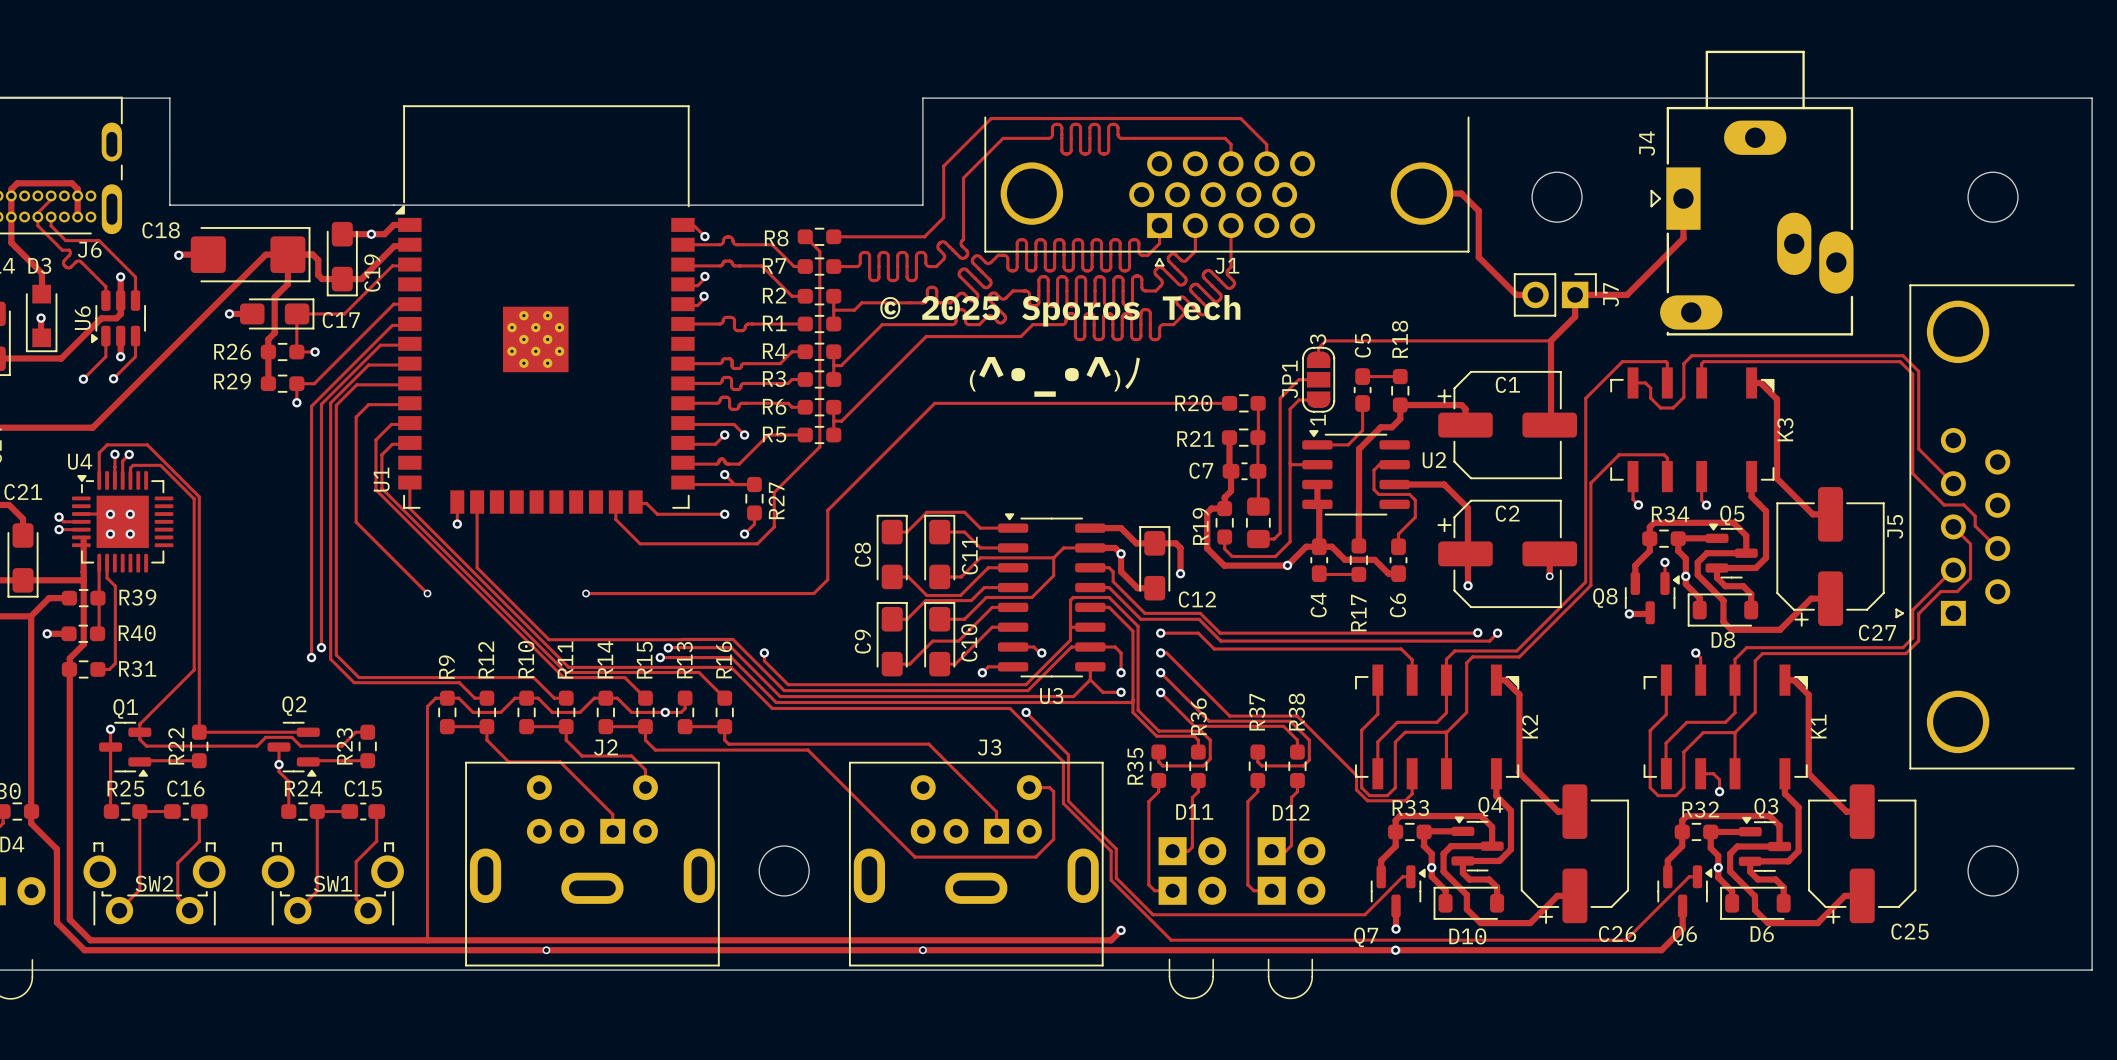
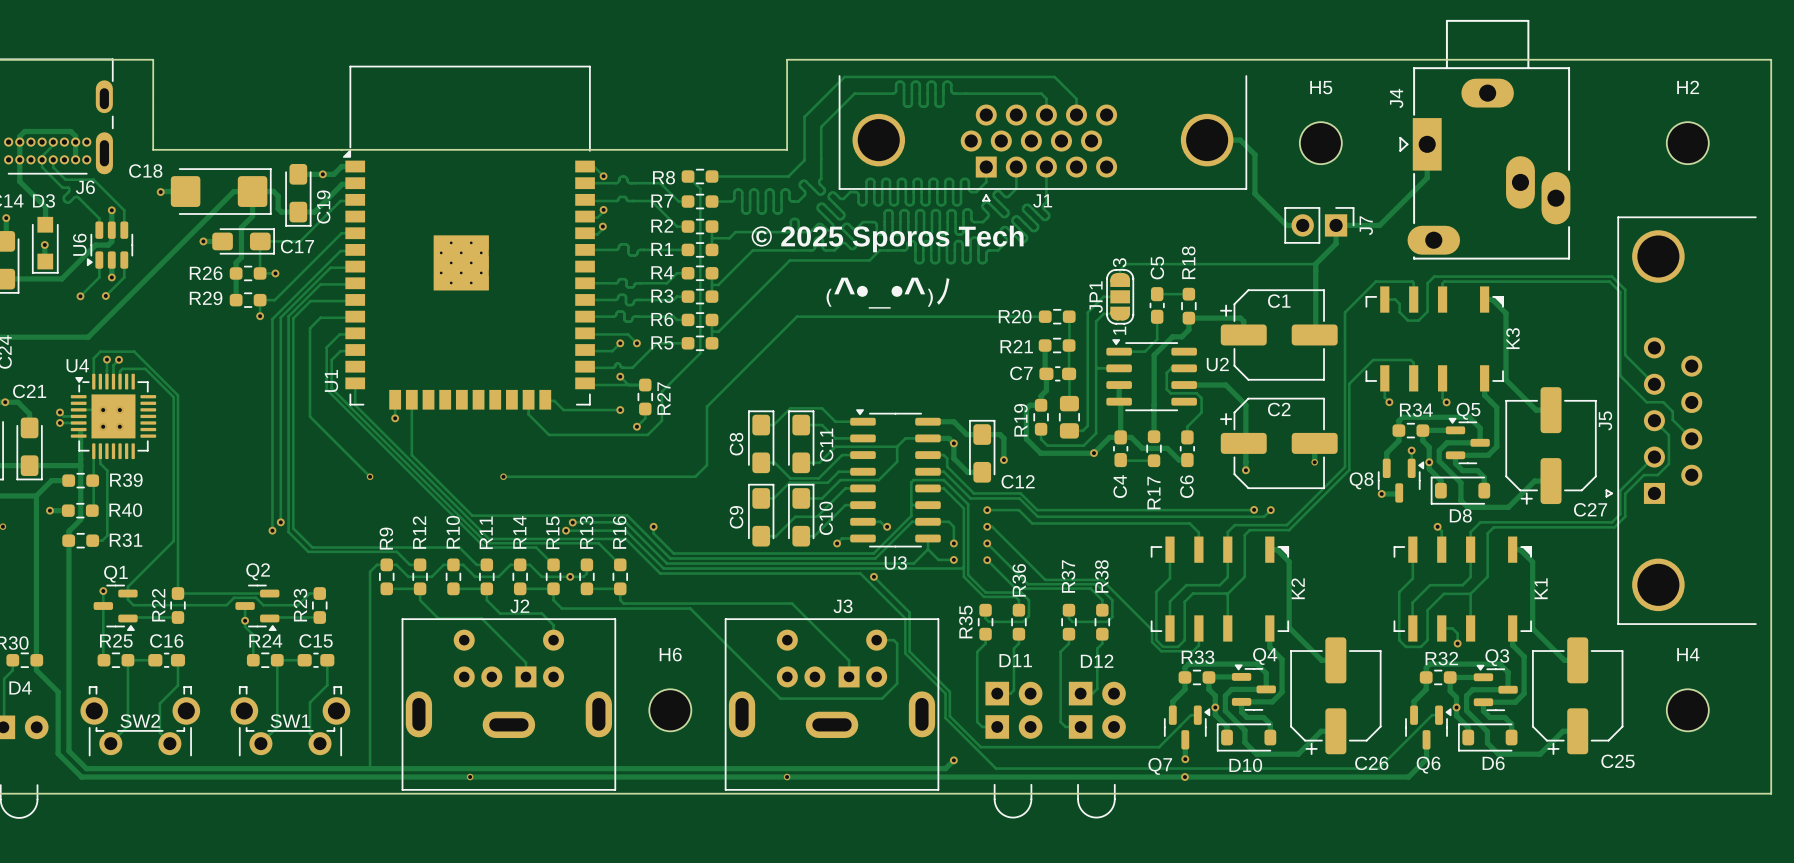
H2 name: none -> H2 (1688, 87)
H5 name: none -> H5 (1321, 87)
H6 name: none -> H6 (670, 654)
H4 name: none -> H4 (1688, 654)

